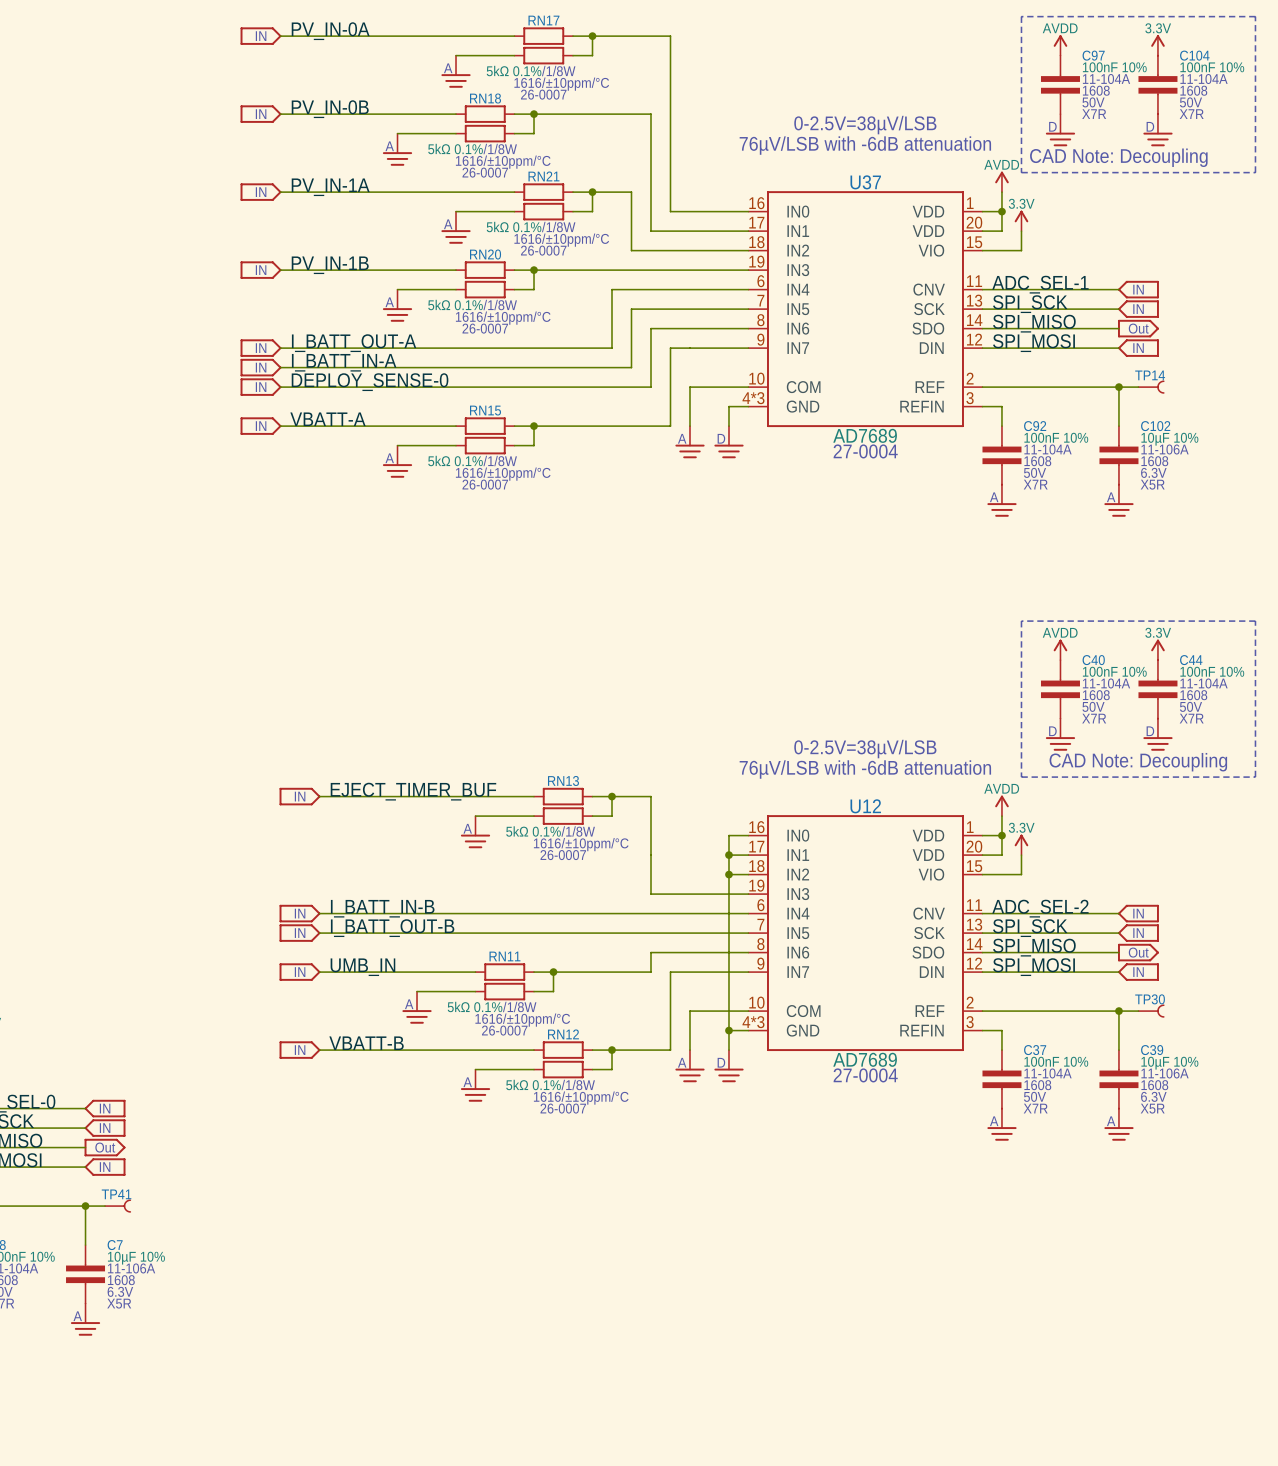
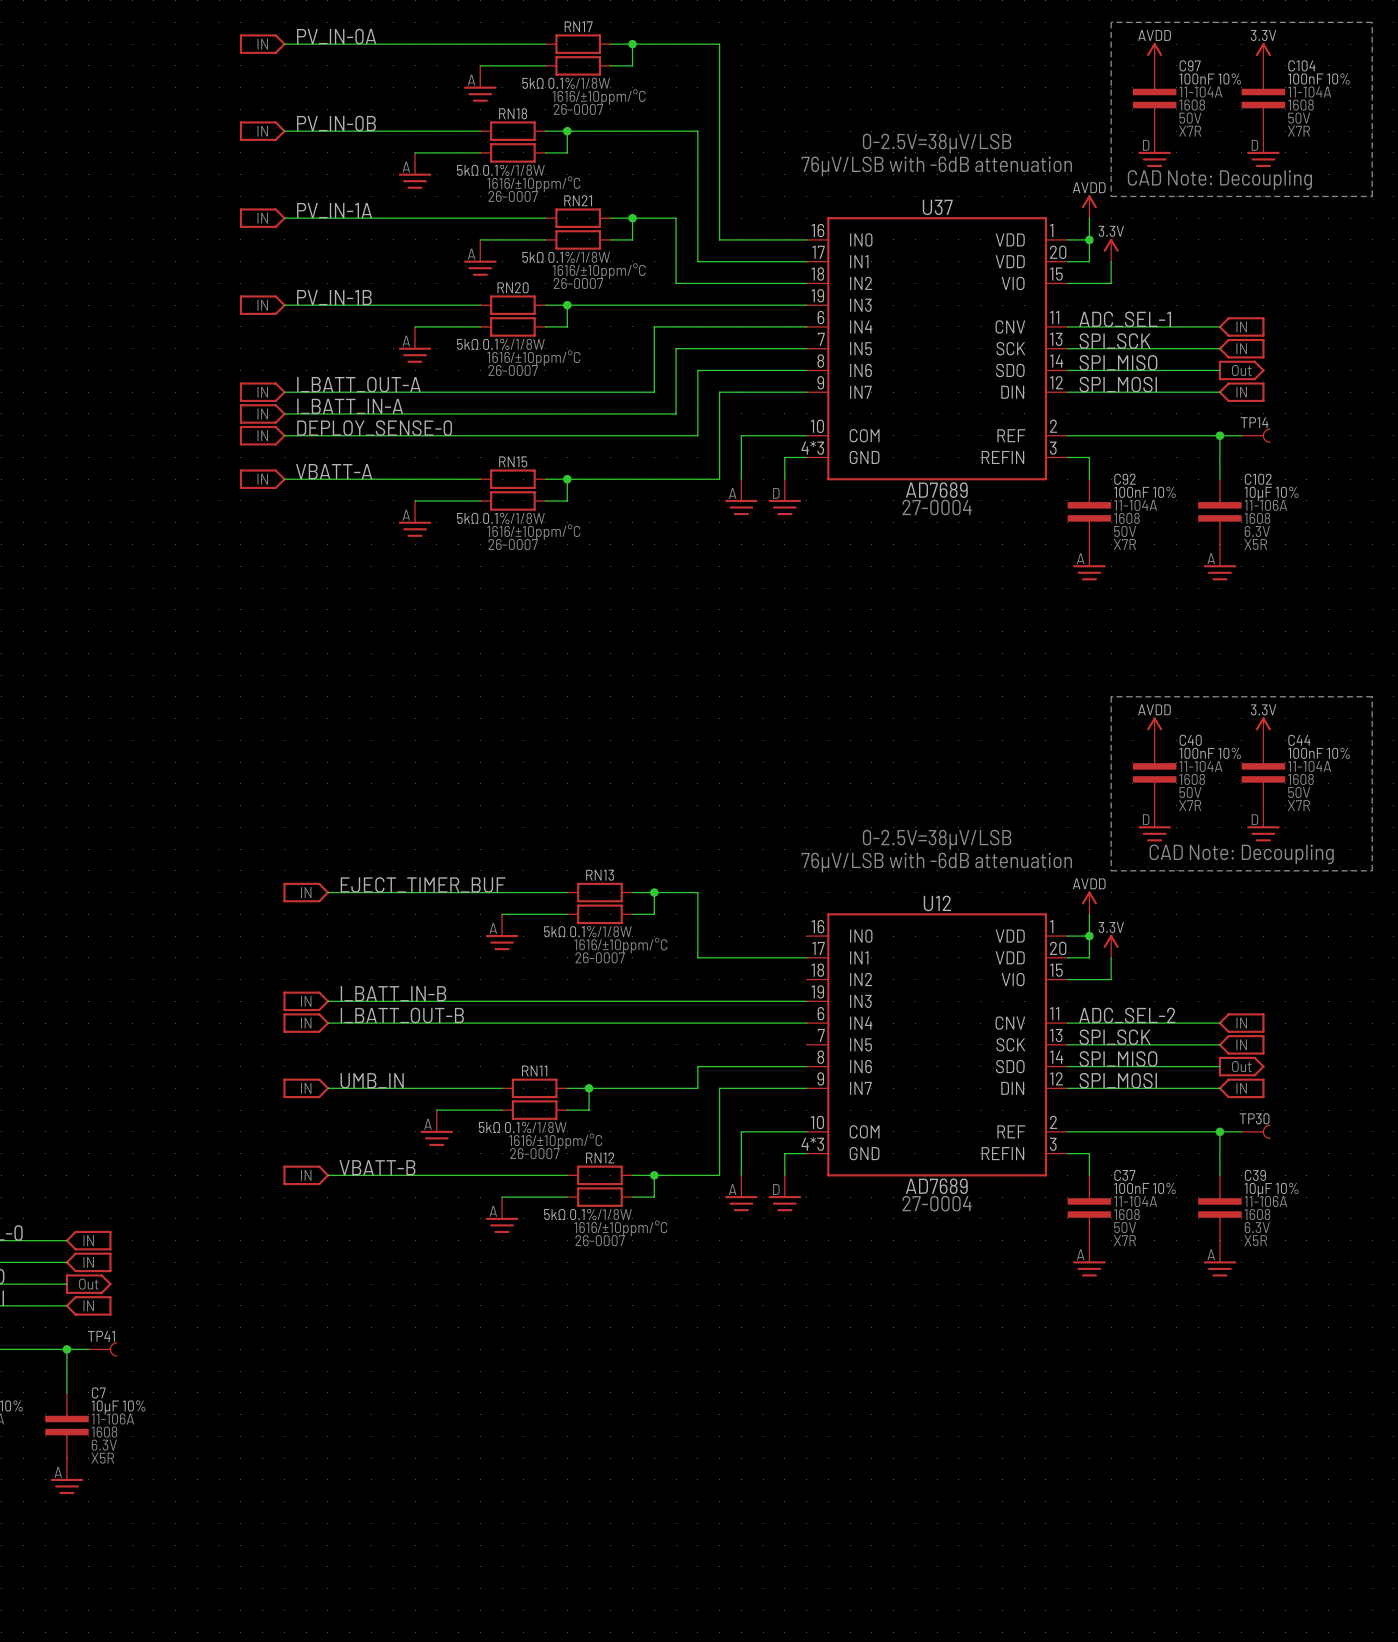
wire: (748, 835) (728, 835) (728, 1030) -> none
wire: (651, 855) (651, 894) -> (697, 957) (784, 957)
junction: (728, 855) -> none
wire: (728, 874) (748, 874) -> none
junction: (728, 874) -> none
label: none -> I_BATT_IN-B (393, 993)
wire: none -> (327, 1001) (697, 1001)
label: I_BATT_IN-B (382, 908) -> I_BATT_OUT-B (402, 1015)
label: I_BATT_OUT-B (392, 928) -> none
part position: (300, 933) -> (306, 1001)
wire: (319, 933) (748, 933) -> none
junction: (728, 1030) -> none

